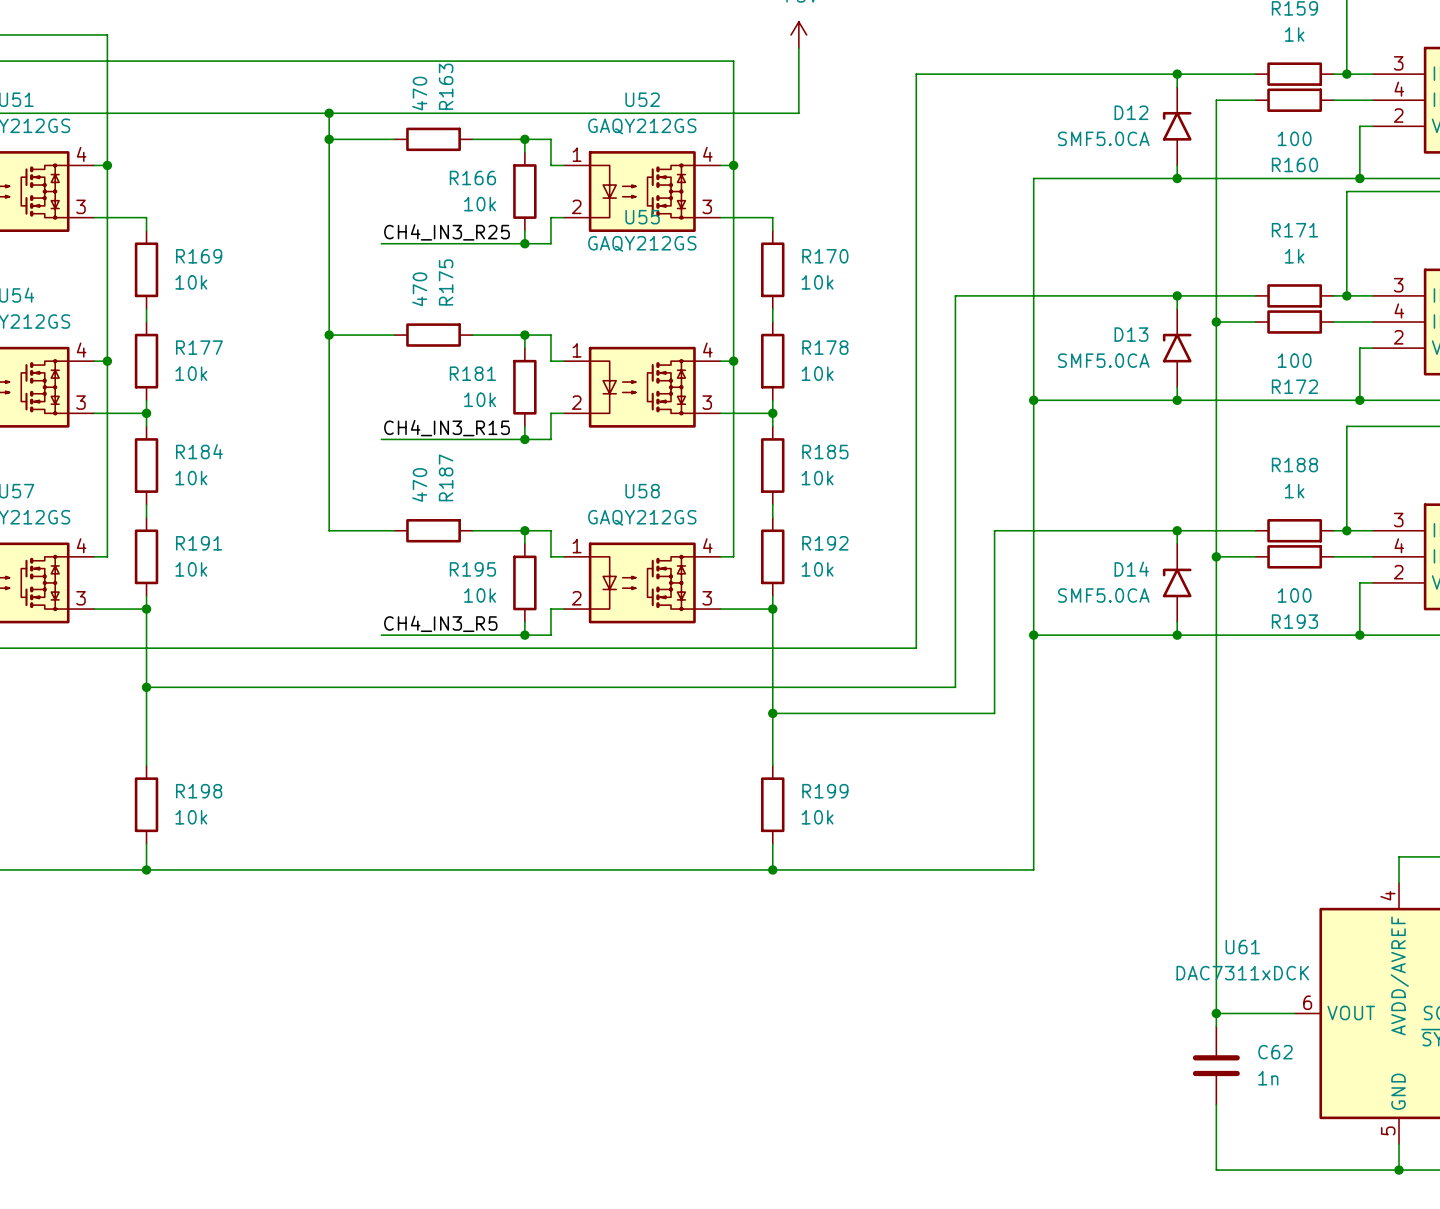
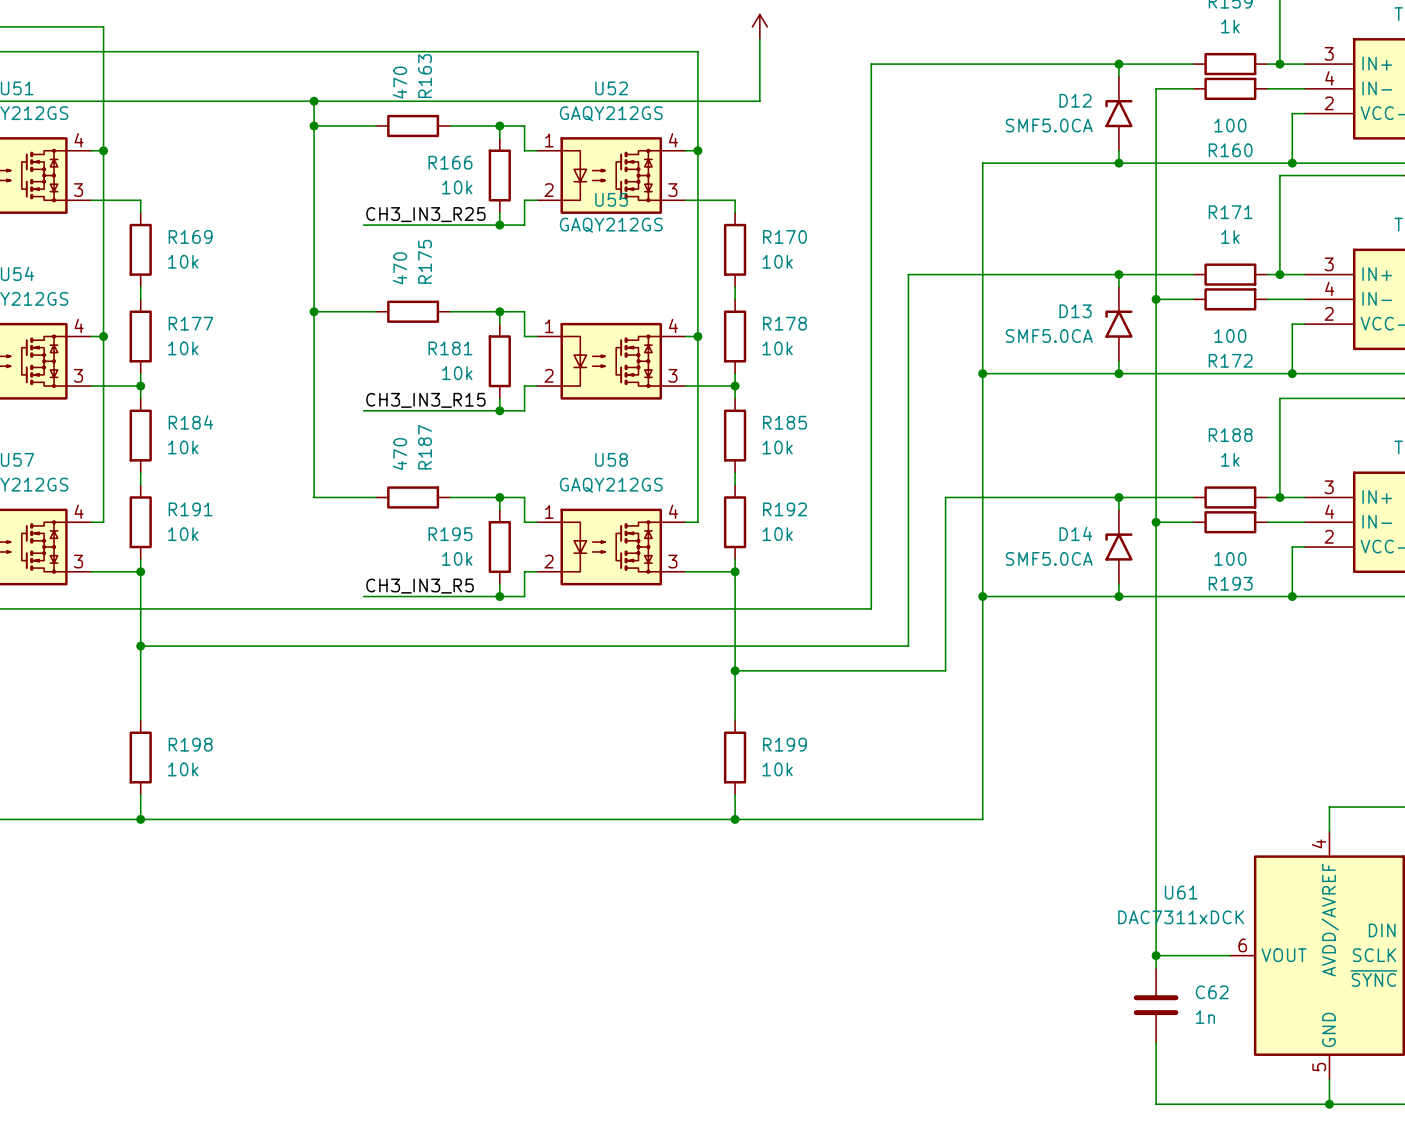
label: CH4_IN3_R25 (447, 232) -> CH3_IN3_R25 (425, 214)
label: CH4_IN3_R15 (447, 428) -> CH3_IN3_R15 (425, 400)
label: CH4_IN3_R5 (440, 623) -> CH3_IN3_R5 (420, 586)

